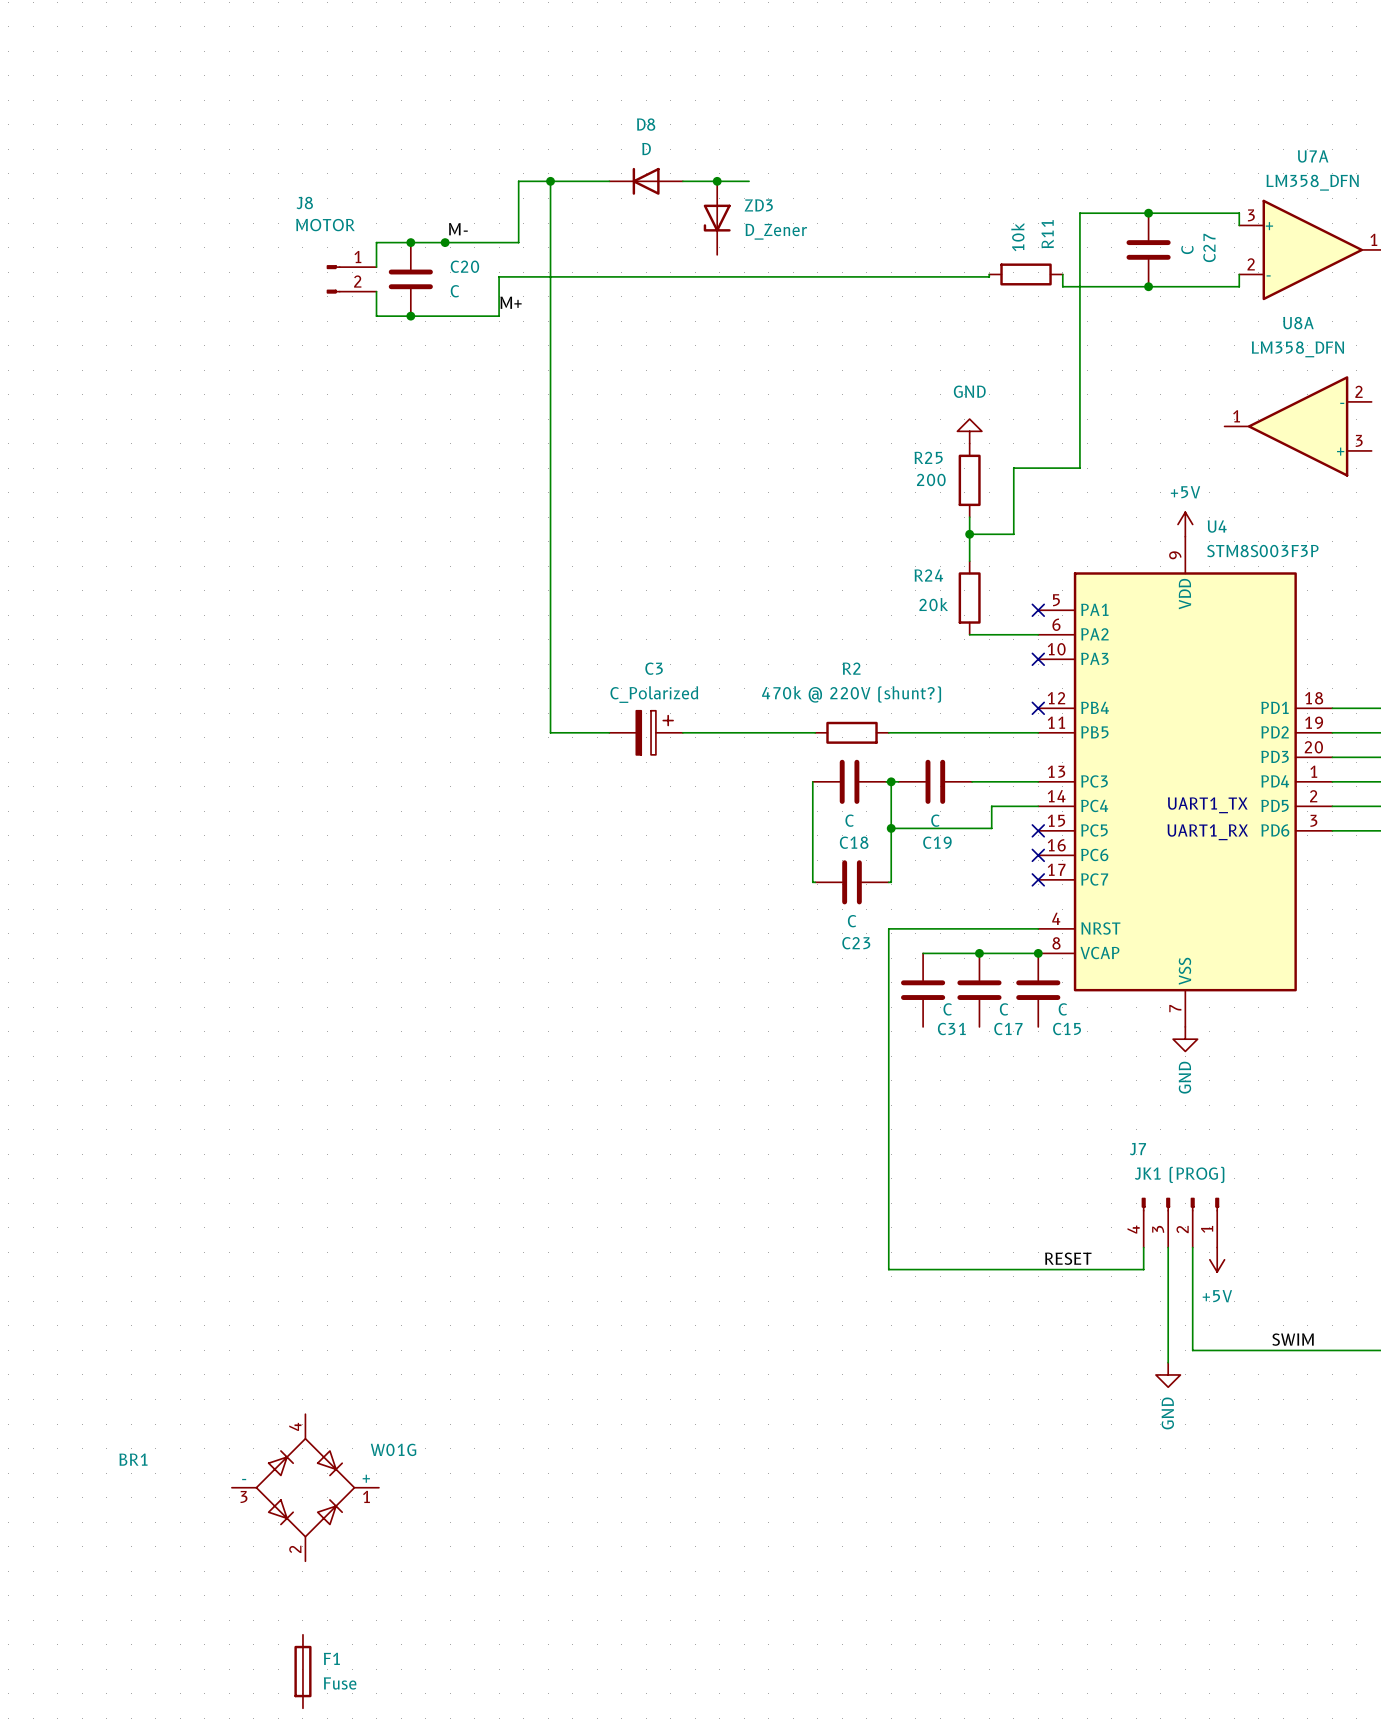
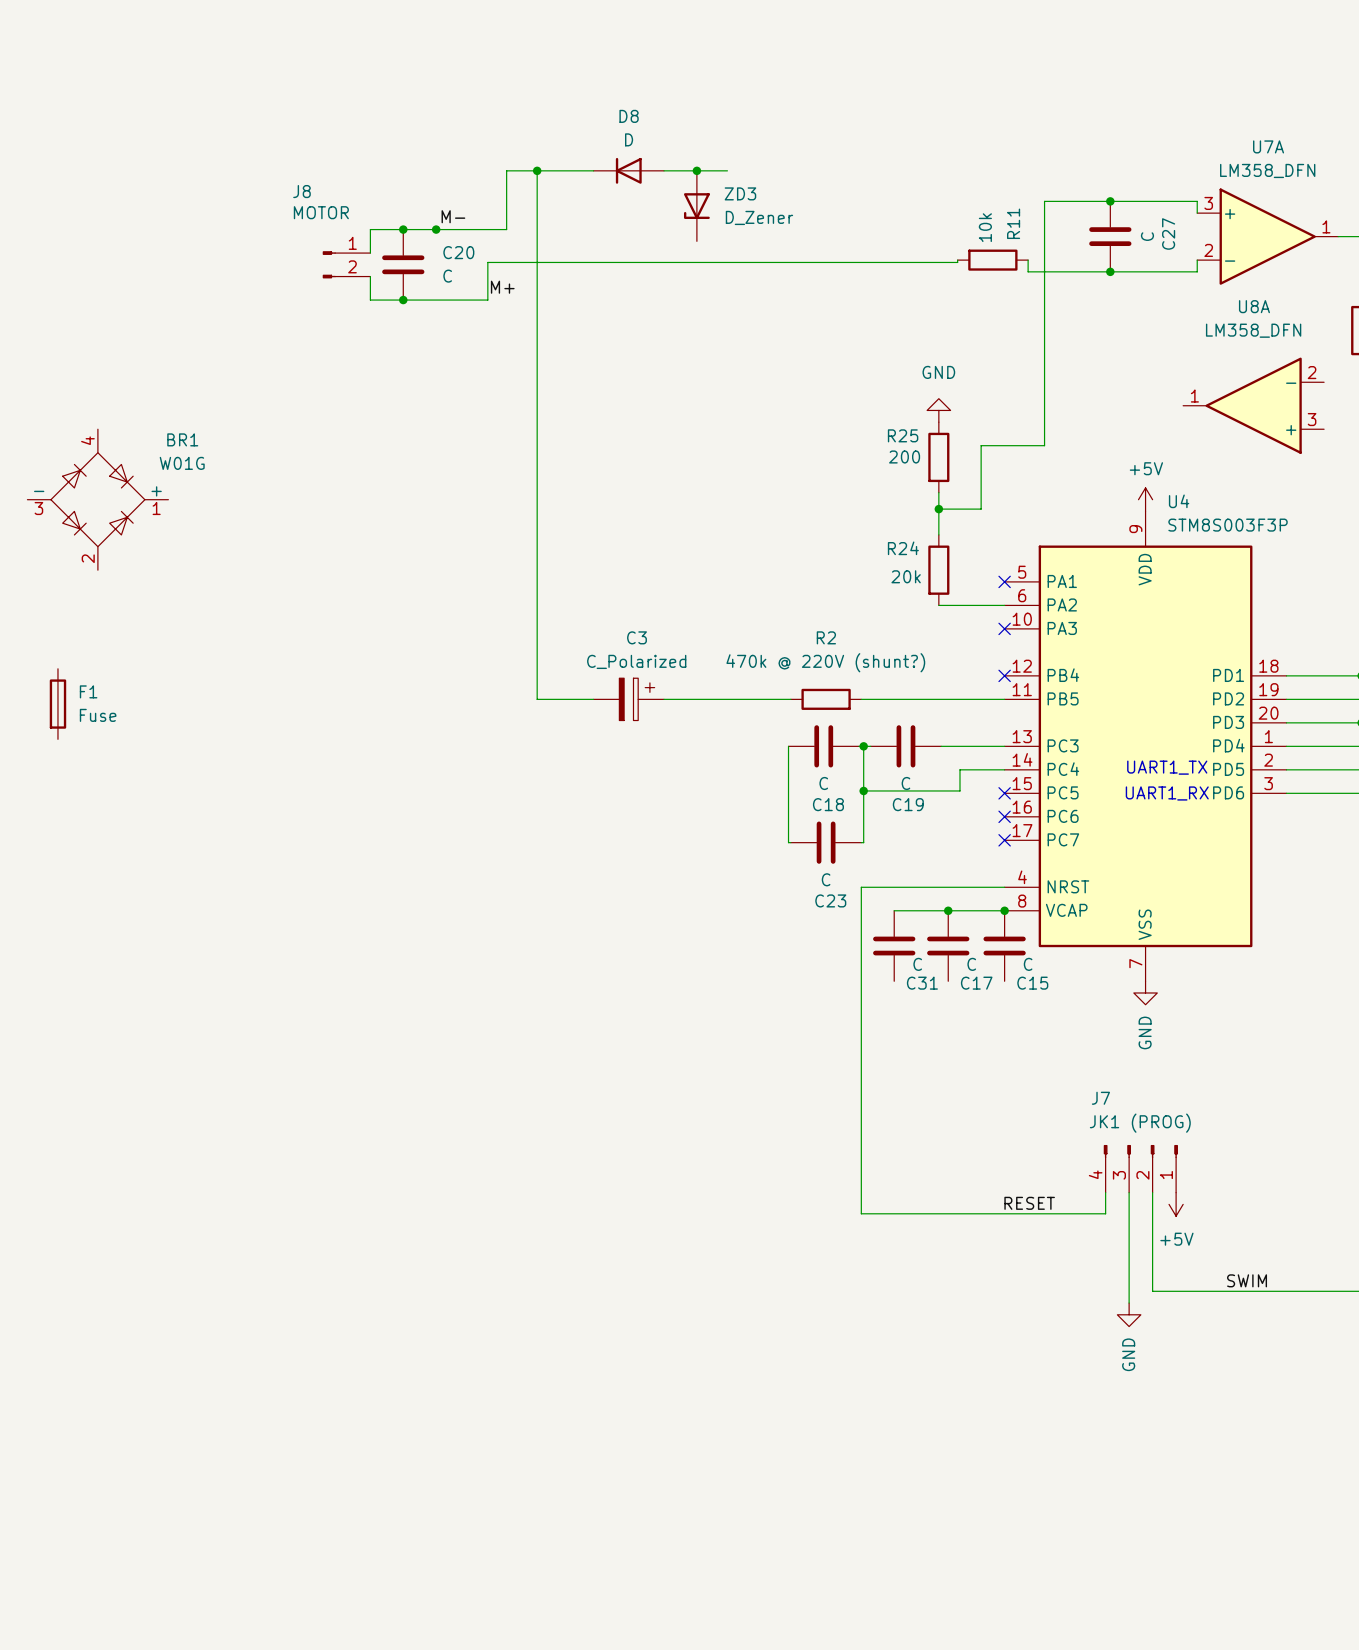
BR1 name position: BR1 (133, 1459) -> BR1 (182, 439)
BR1 position: (305, 1487) -> (97, 499)
F1 position: (302, 1671) -> (57, 704)

